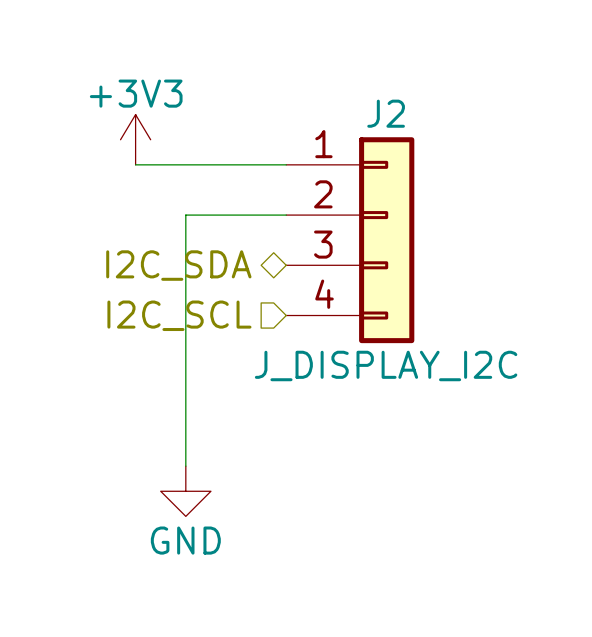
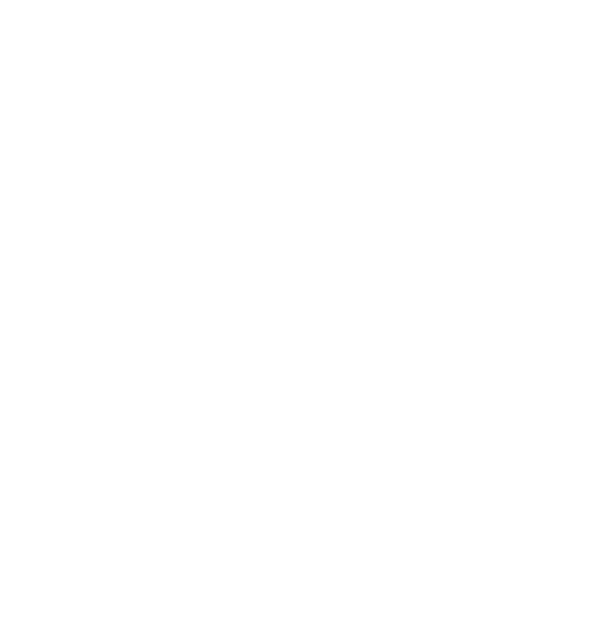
power symbol: +3V3 (135, 139) -> none
wire: (135, 164) (286, 164) -> none
wire: (286, 215) (185, 215) (185, 466) -> none
J2: J_DISPLAY_I2C (350, 240) -> none
hierarchical label: I2C_SDA (178, 265) -> none
hierarchical label: I2C_SCL (179, 315) -> none
power symbol: GND (185, 491) -> none

